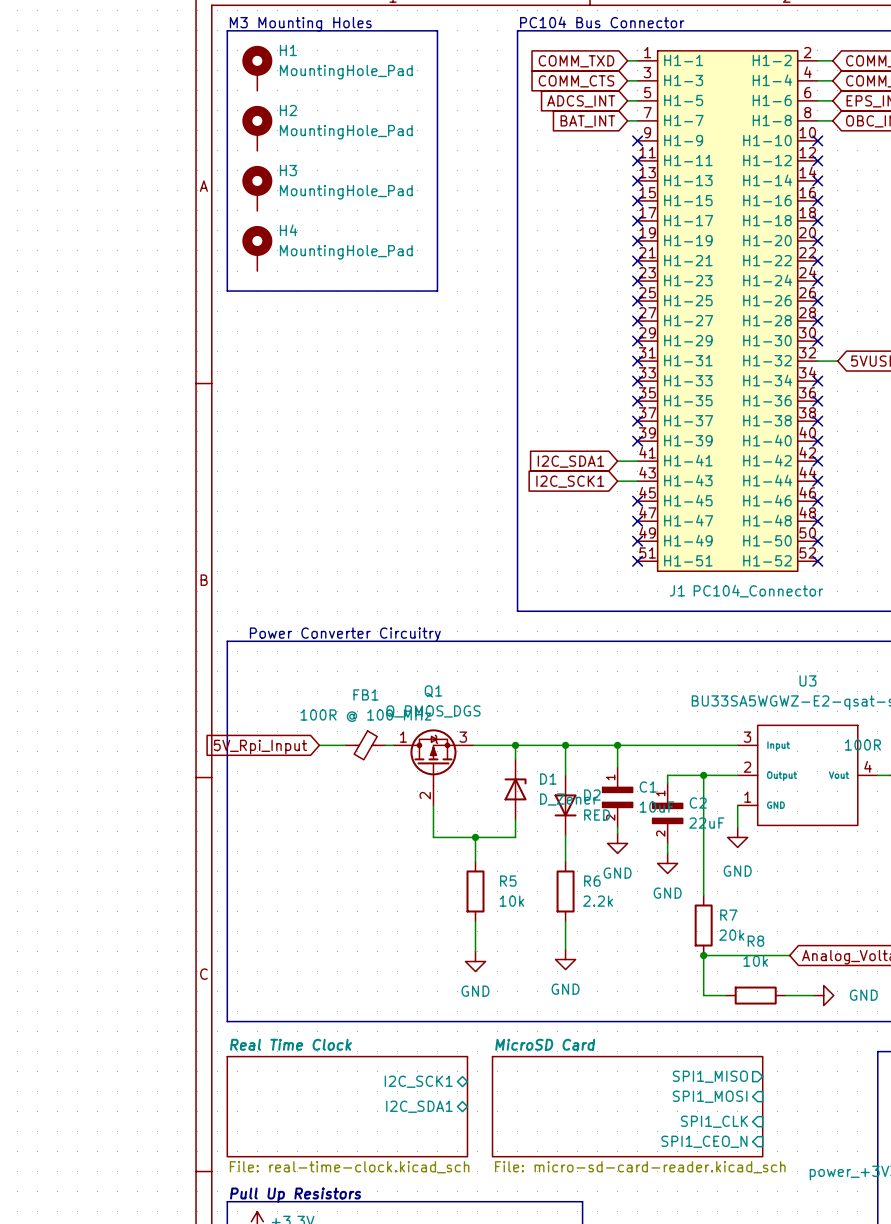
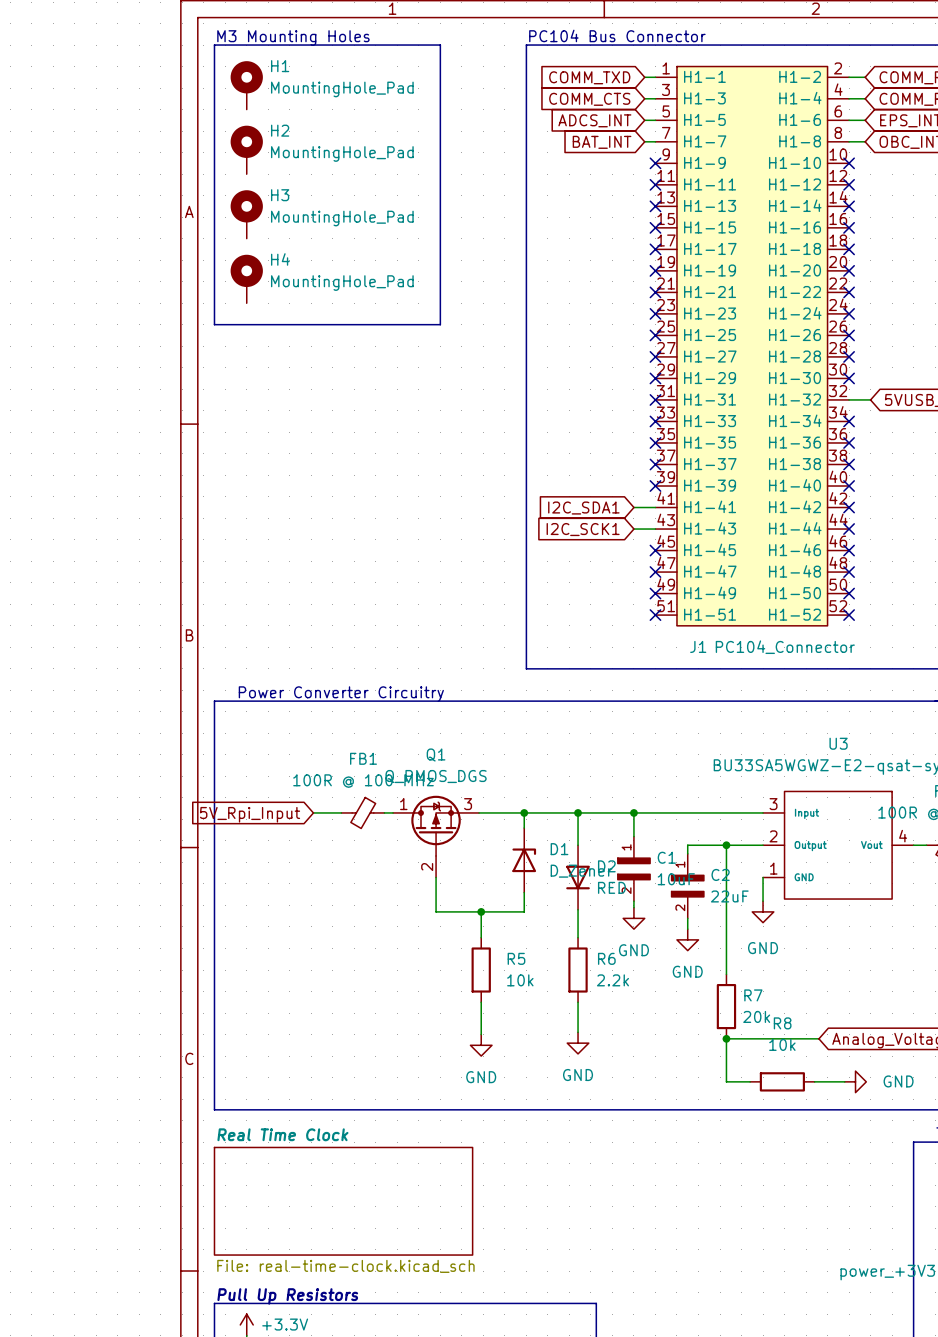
sheet pin: SPI1_MISO (710, 1076) -> none
sheet pin: I2C_SCK1 (418, 1081) -> none
sheet pin: SPI1_MOSI (710, 1096) -> none
sheet pin: I2C_SDA1 (419, 1106) -> none
sheet MicroSD Card: File: micro-sd-card-reader.kicad_sch (627, 1106) -> none
sheet pin: SPI1_CLK (714, 1121) -> none
sheet pin: SPI1_CEO_N (704, 1141) -> none

